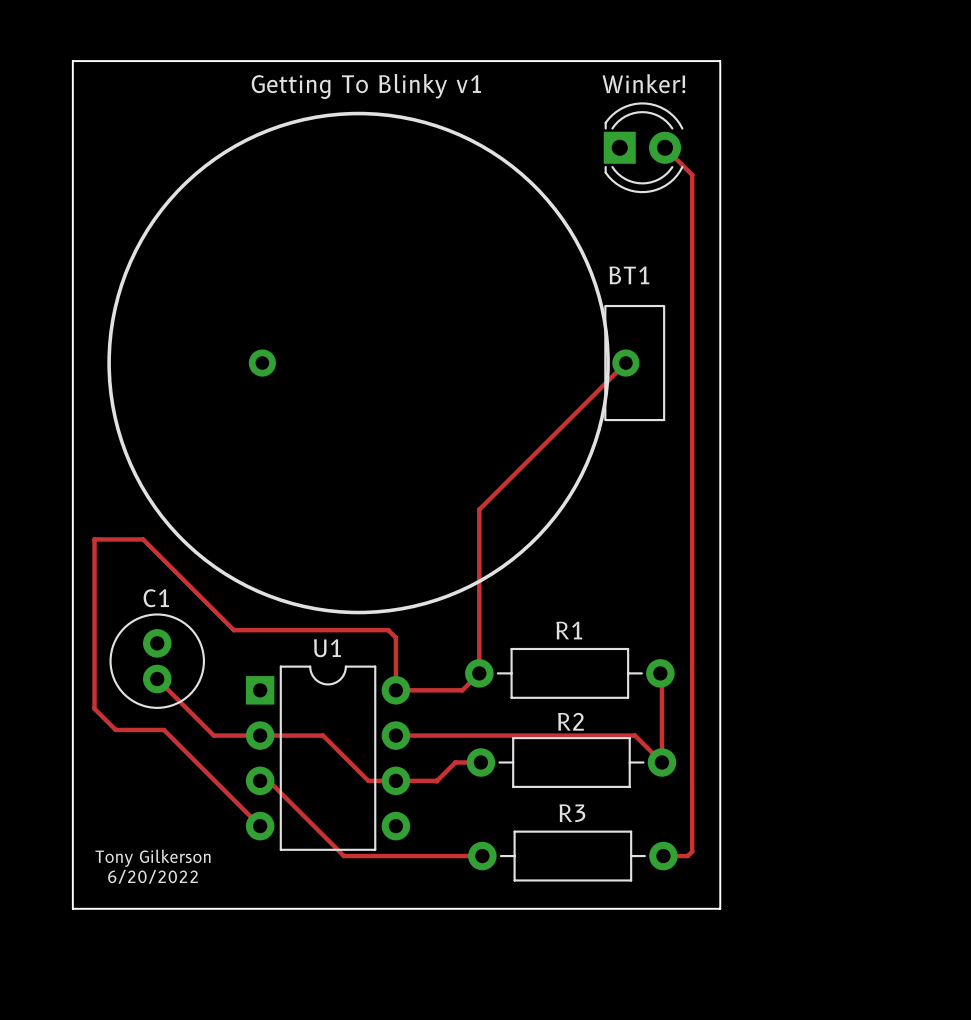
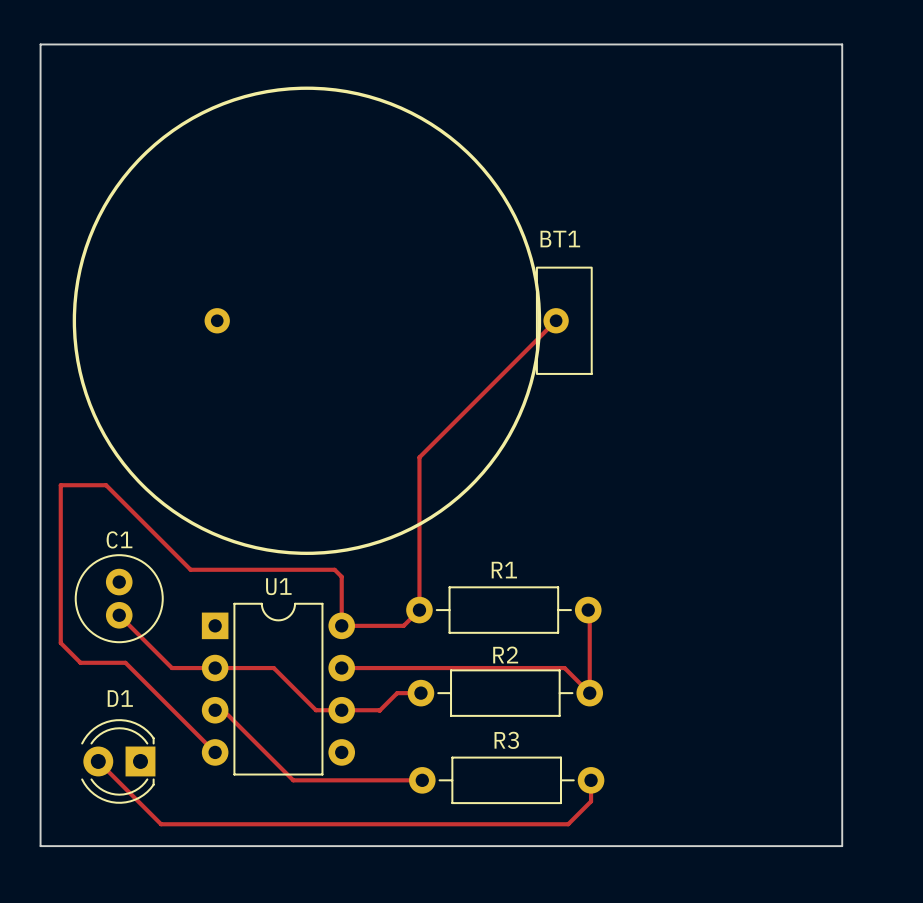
board edge: (72, 66) (72, 61) (720, 61) (720, 908) (72, 908) -> (40, 44) (842, 44) (842, 846) (40, 846) (40, 829)
text: Getting To Blinky v1 (366, 86) -> none
Winker!: (643, 147) -> none
track: (665, 147) (692, 174) (692, 851) (687, 856) (663, 856) -> (98, 761) (161, 824) (568, 824) (591, 801) (591, 780)
D1: none -> (118, 761)
text: Tony Gilkerson (153, 858) -> none
text: 6/20/2022 (153, 876) -> none

